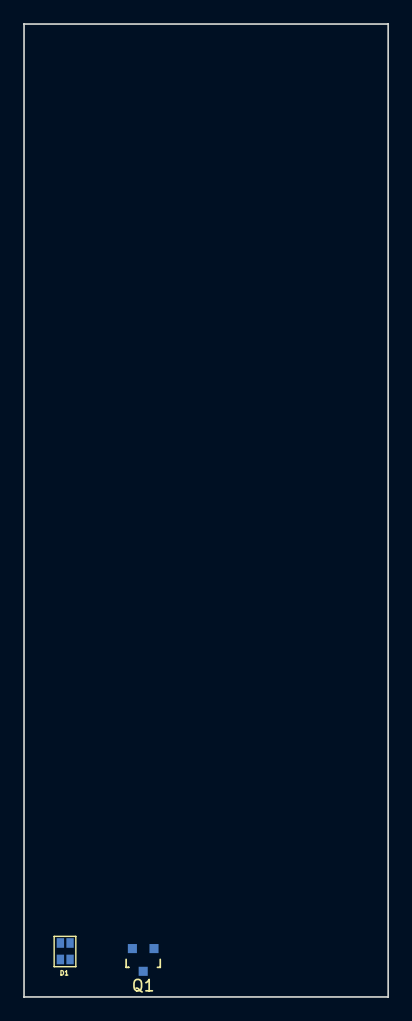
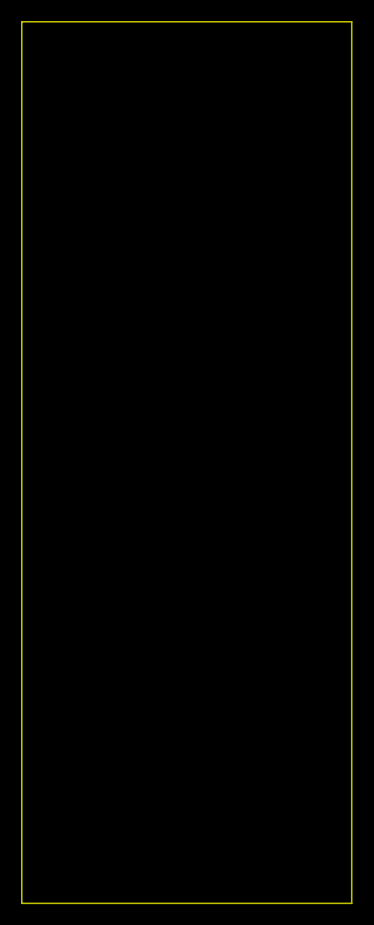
part: (64, 951) -> none
Q1: (143, 959) -> none

